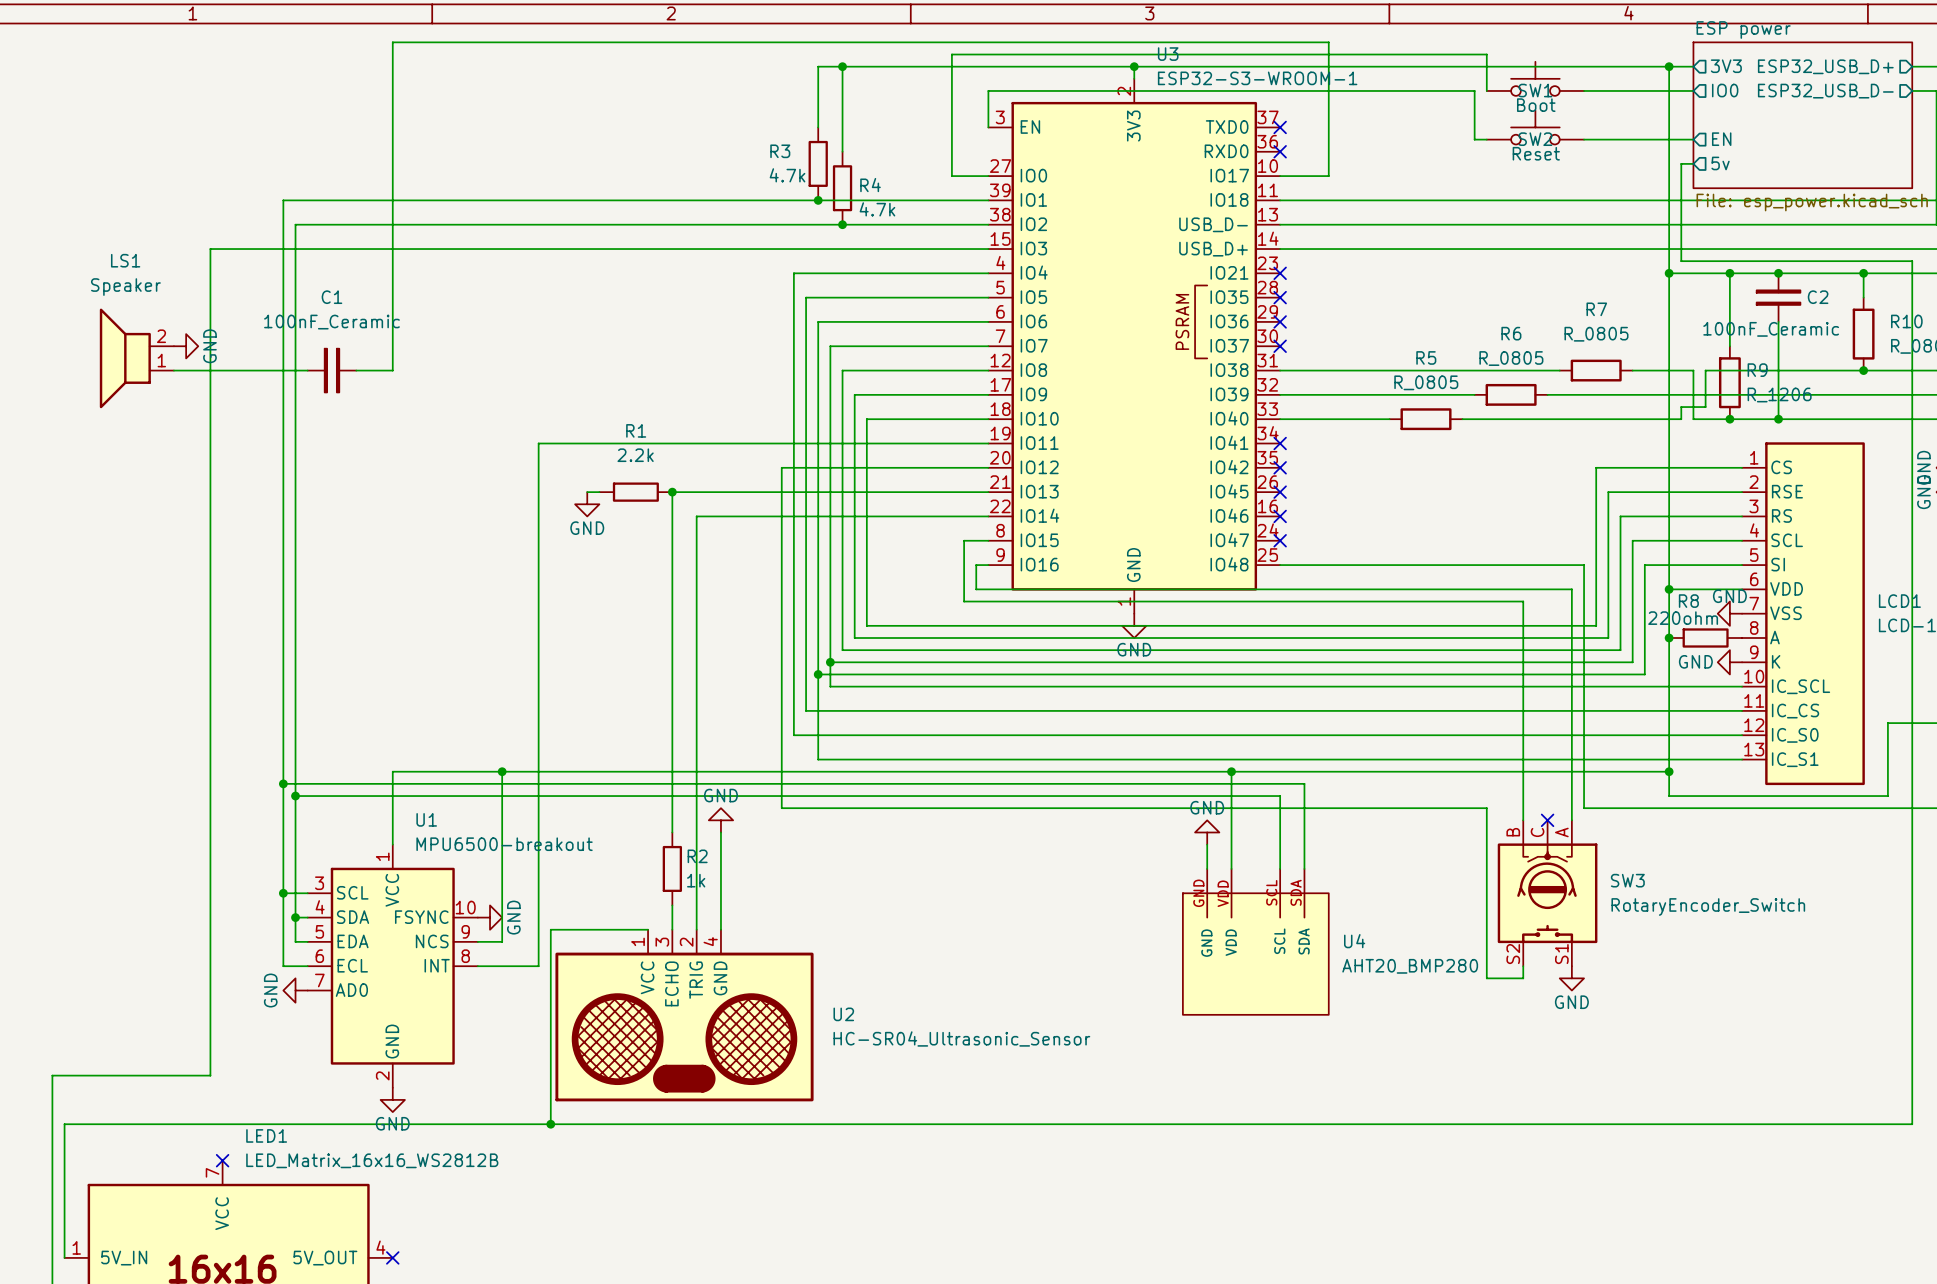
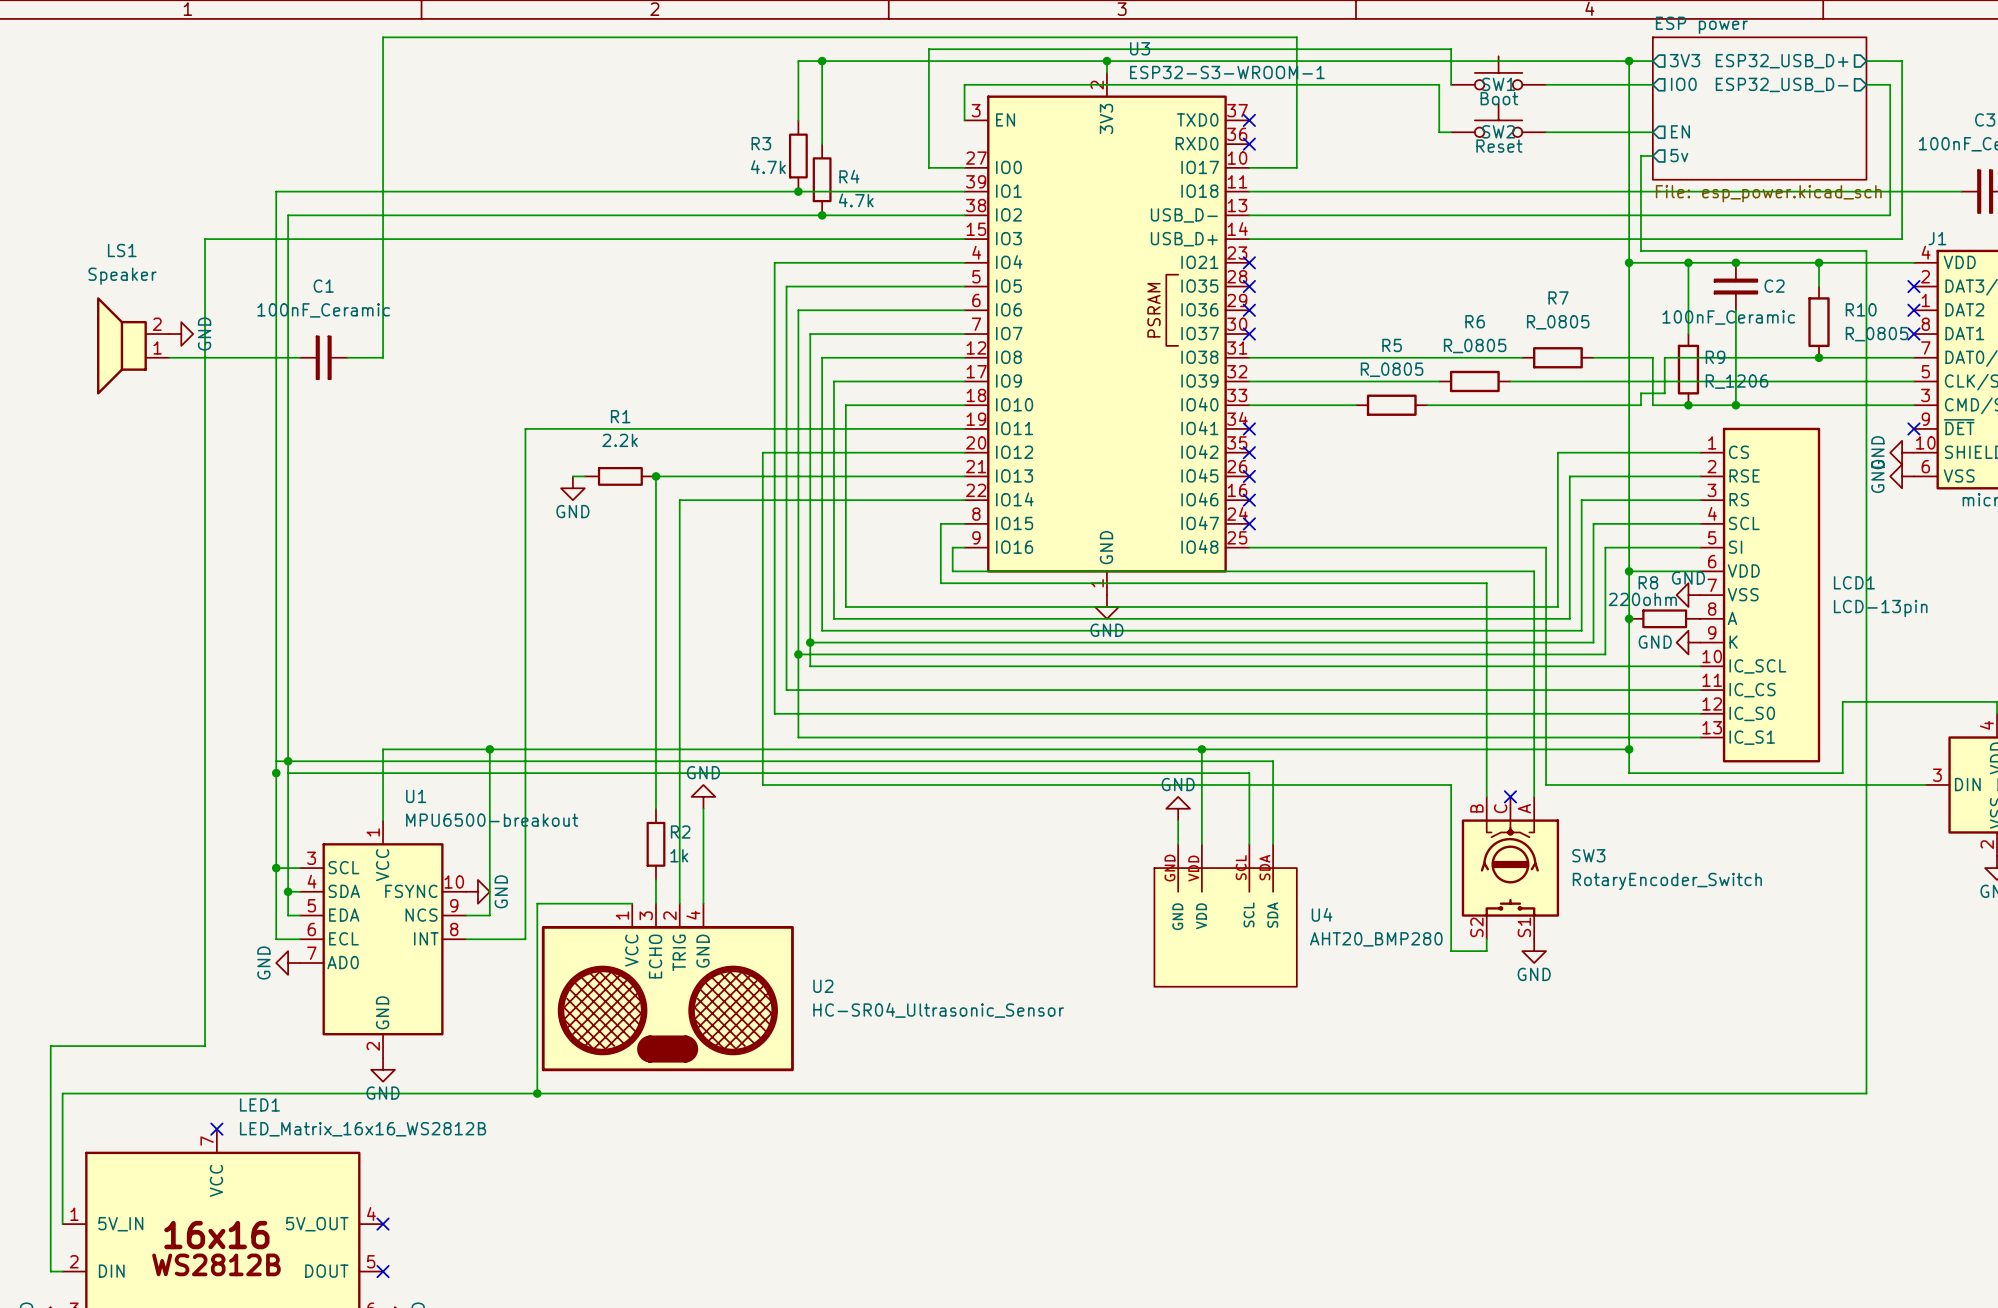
junction: (283, 783) -> none
junction: none -> (288, 761)
junction: none -> (276, 773)
junction: (295, 796) -> none

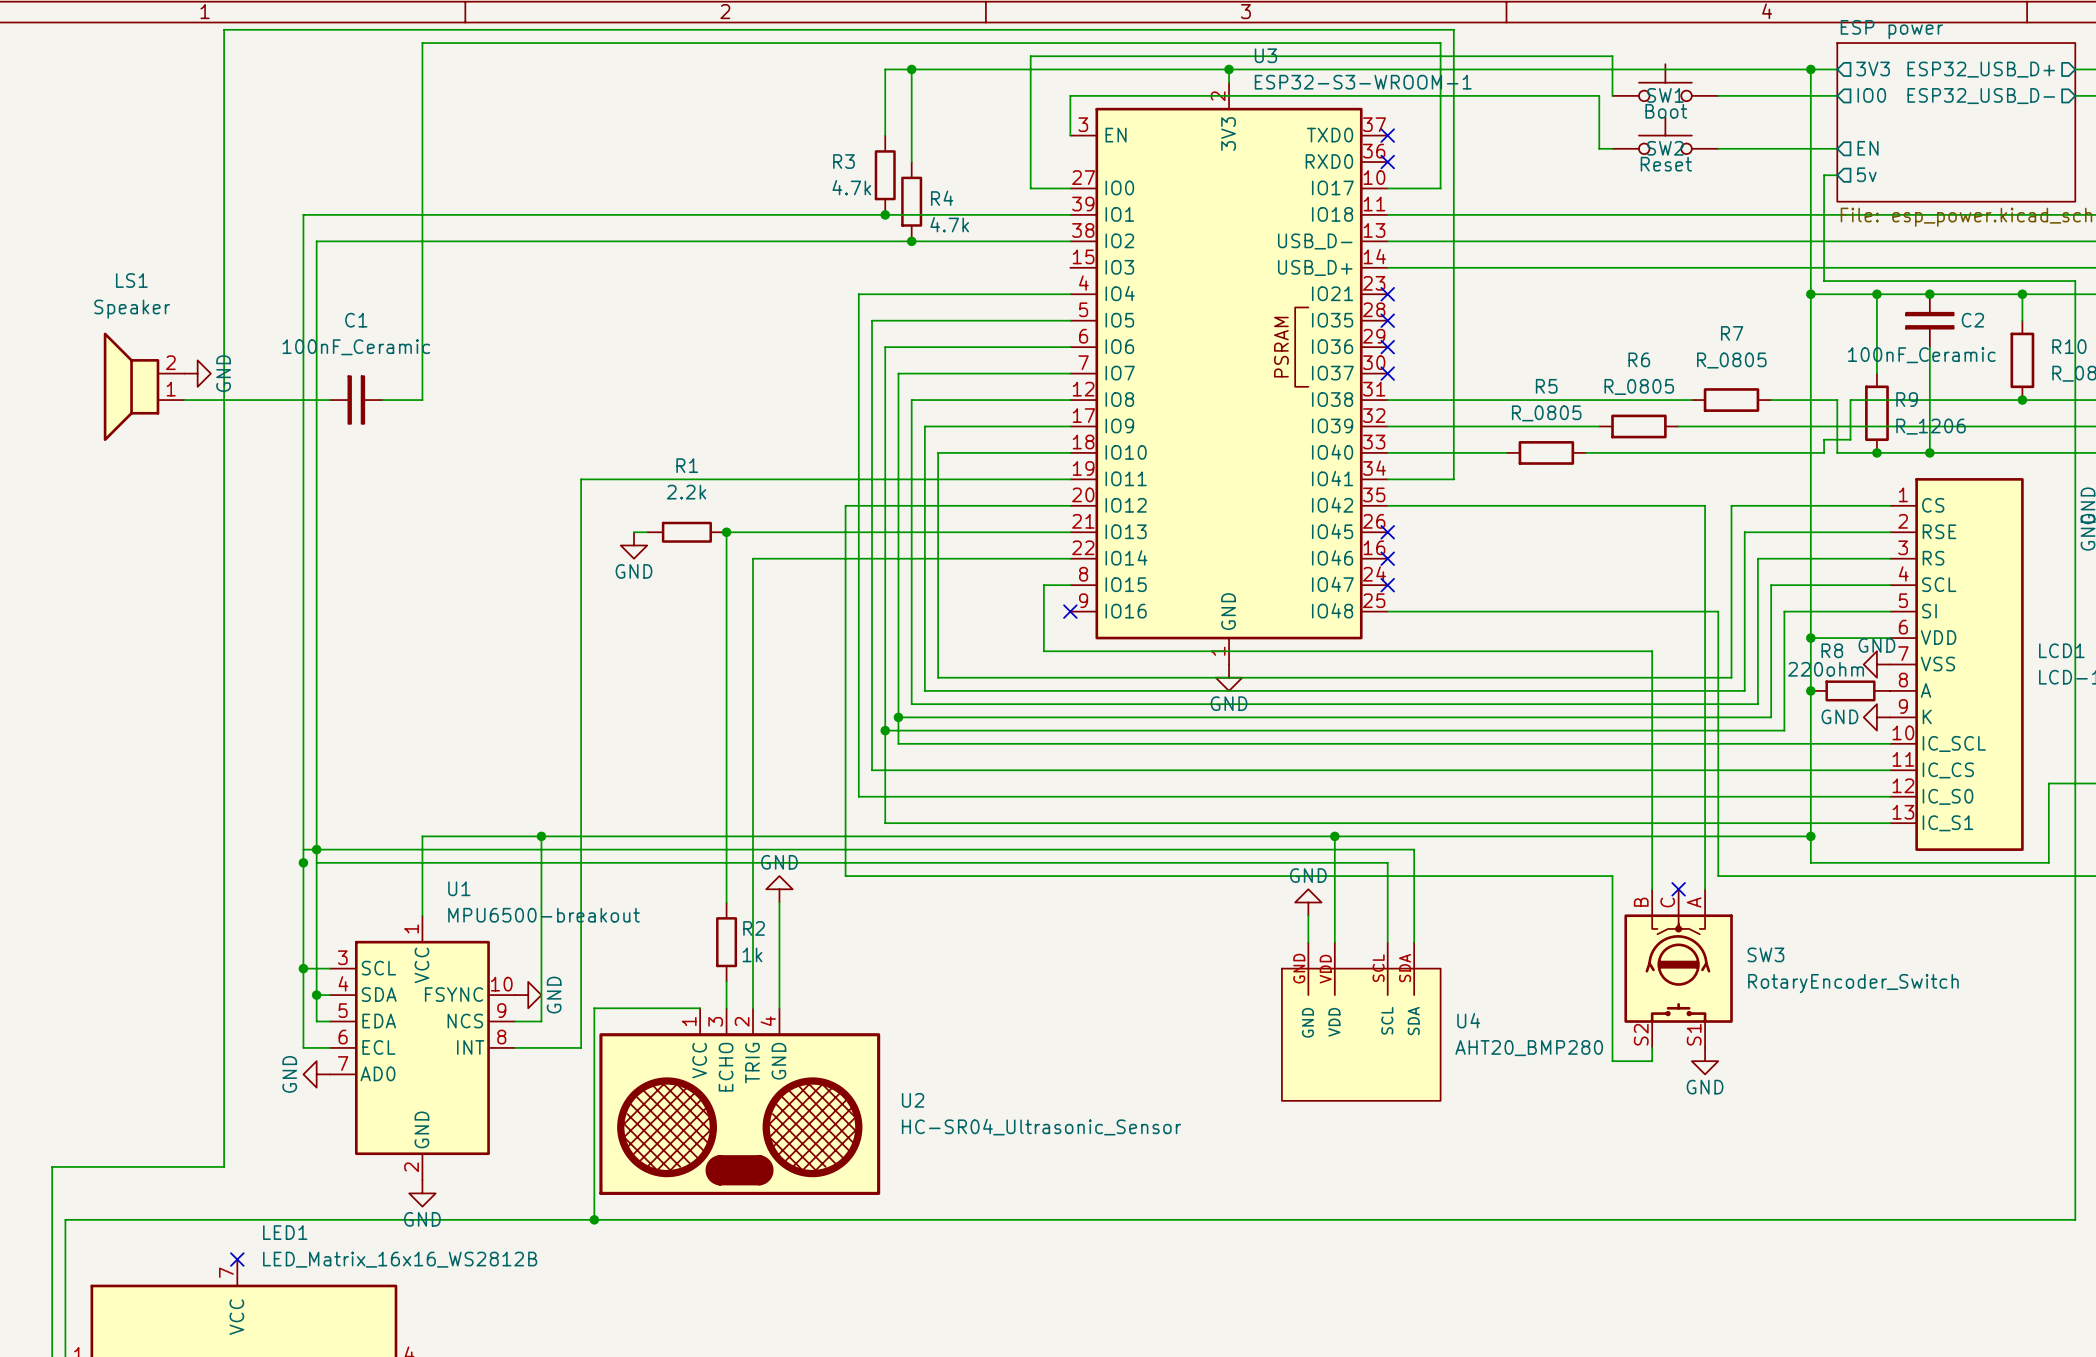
wire: (205, 239) (964, 239) -> (224, 267) (224, 29) (1453, 29) (1453, 479) (1387, 479)
no-connect mark: (1249, 428) -> none
no-connect mark: (1249, 452) -> none
wire: (964, 547) (952, 547) (952, 571) (1534, 571) -> (1387, 505) (1705, 505) (1705, 638)
no-connect mark: none -> (1070, 611)

